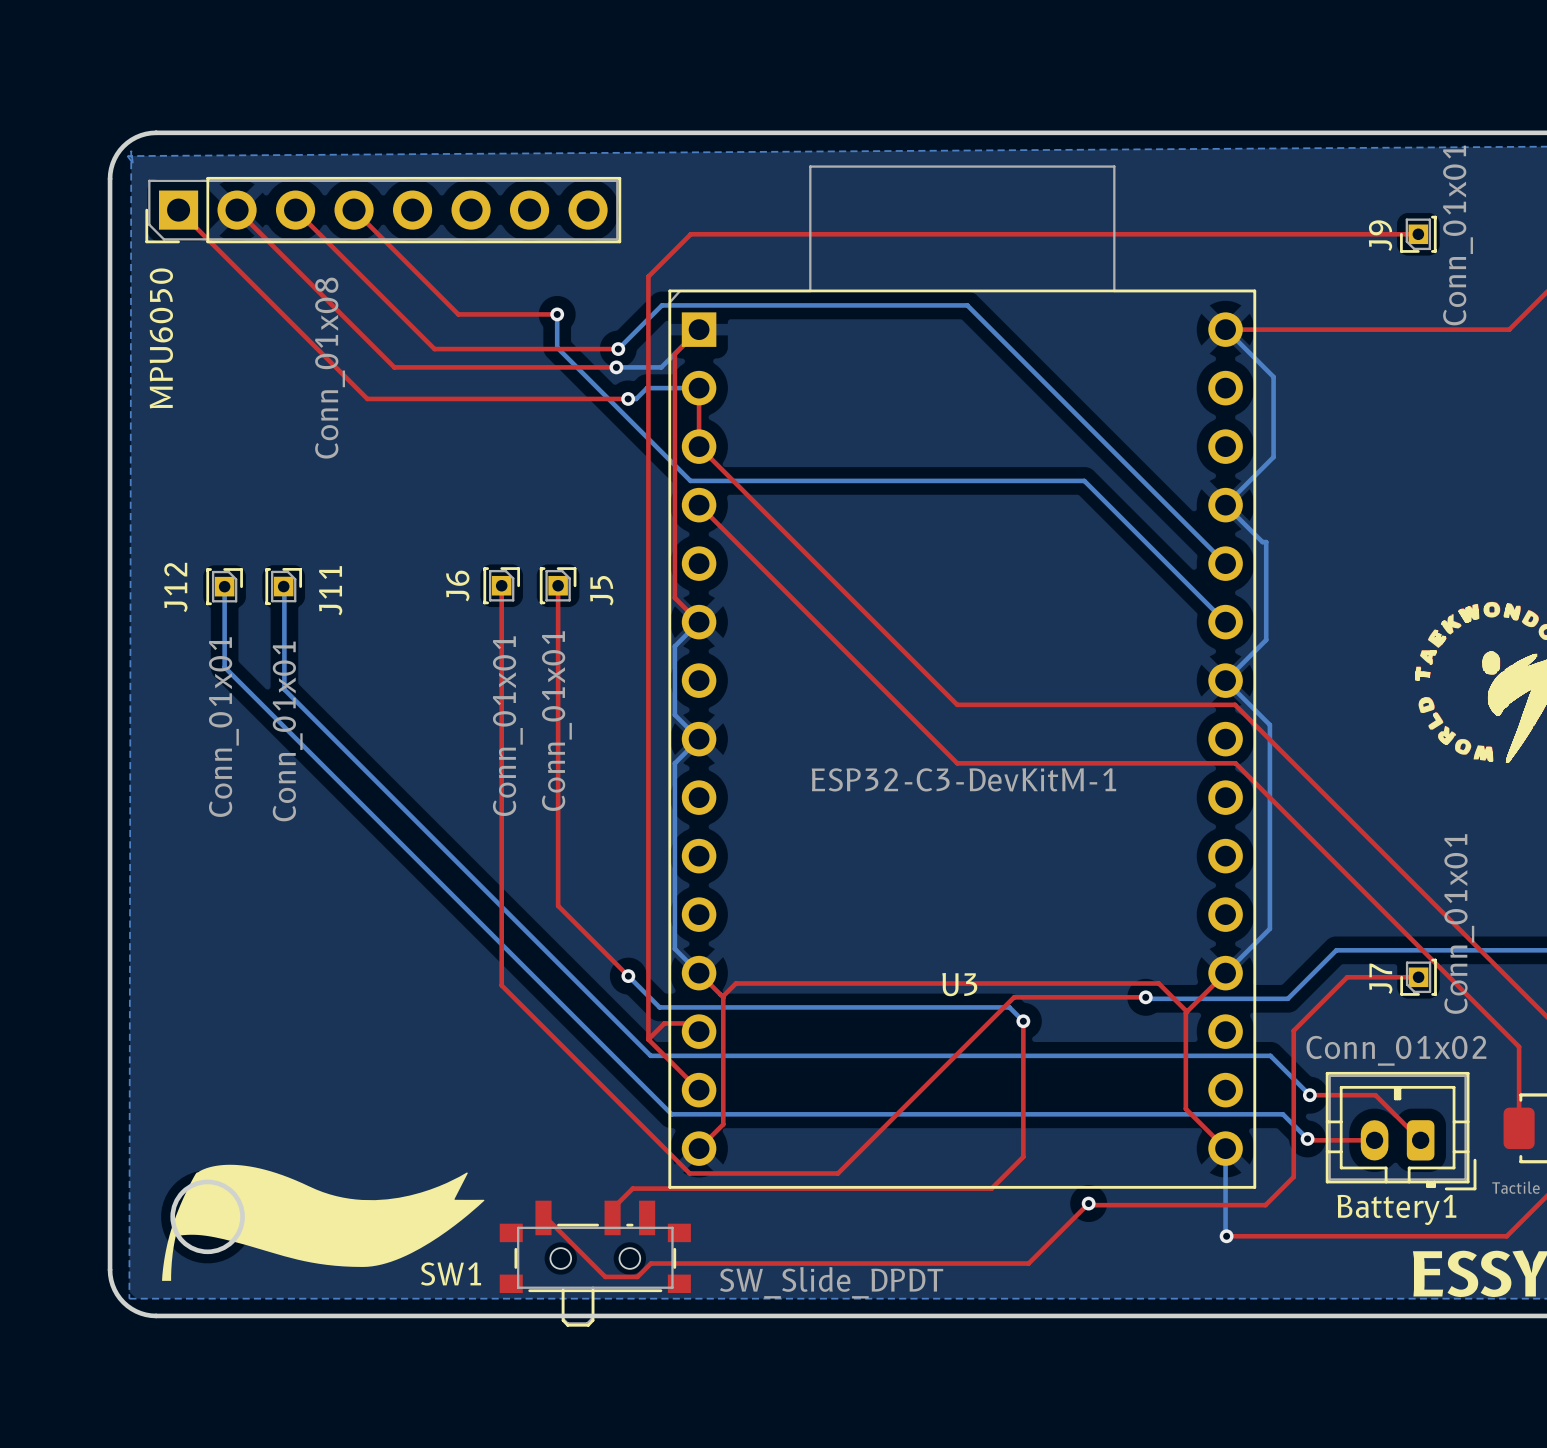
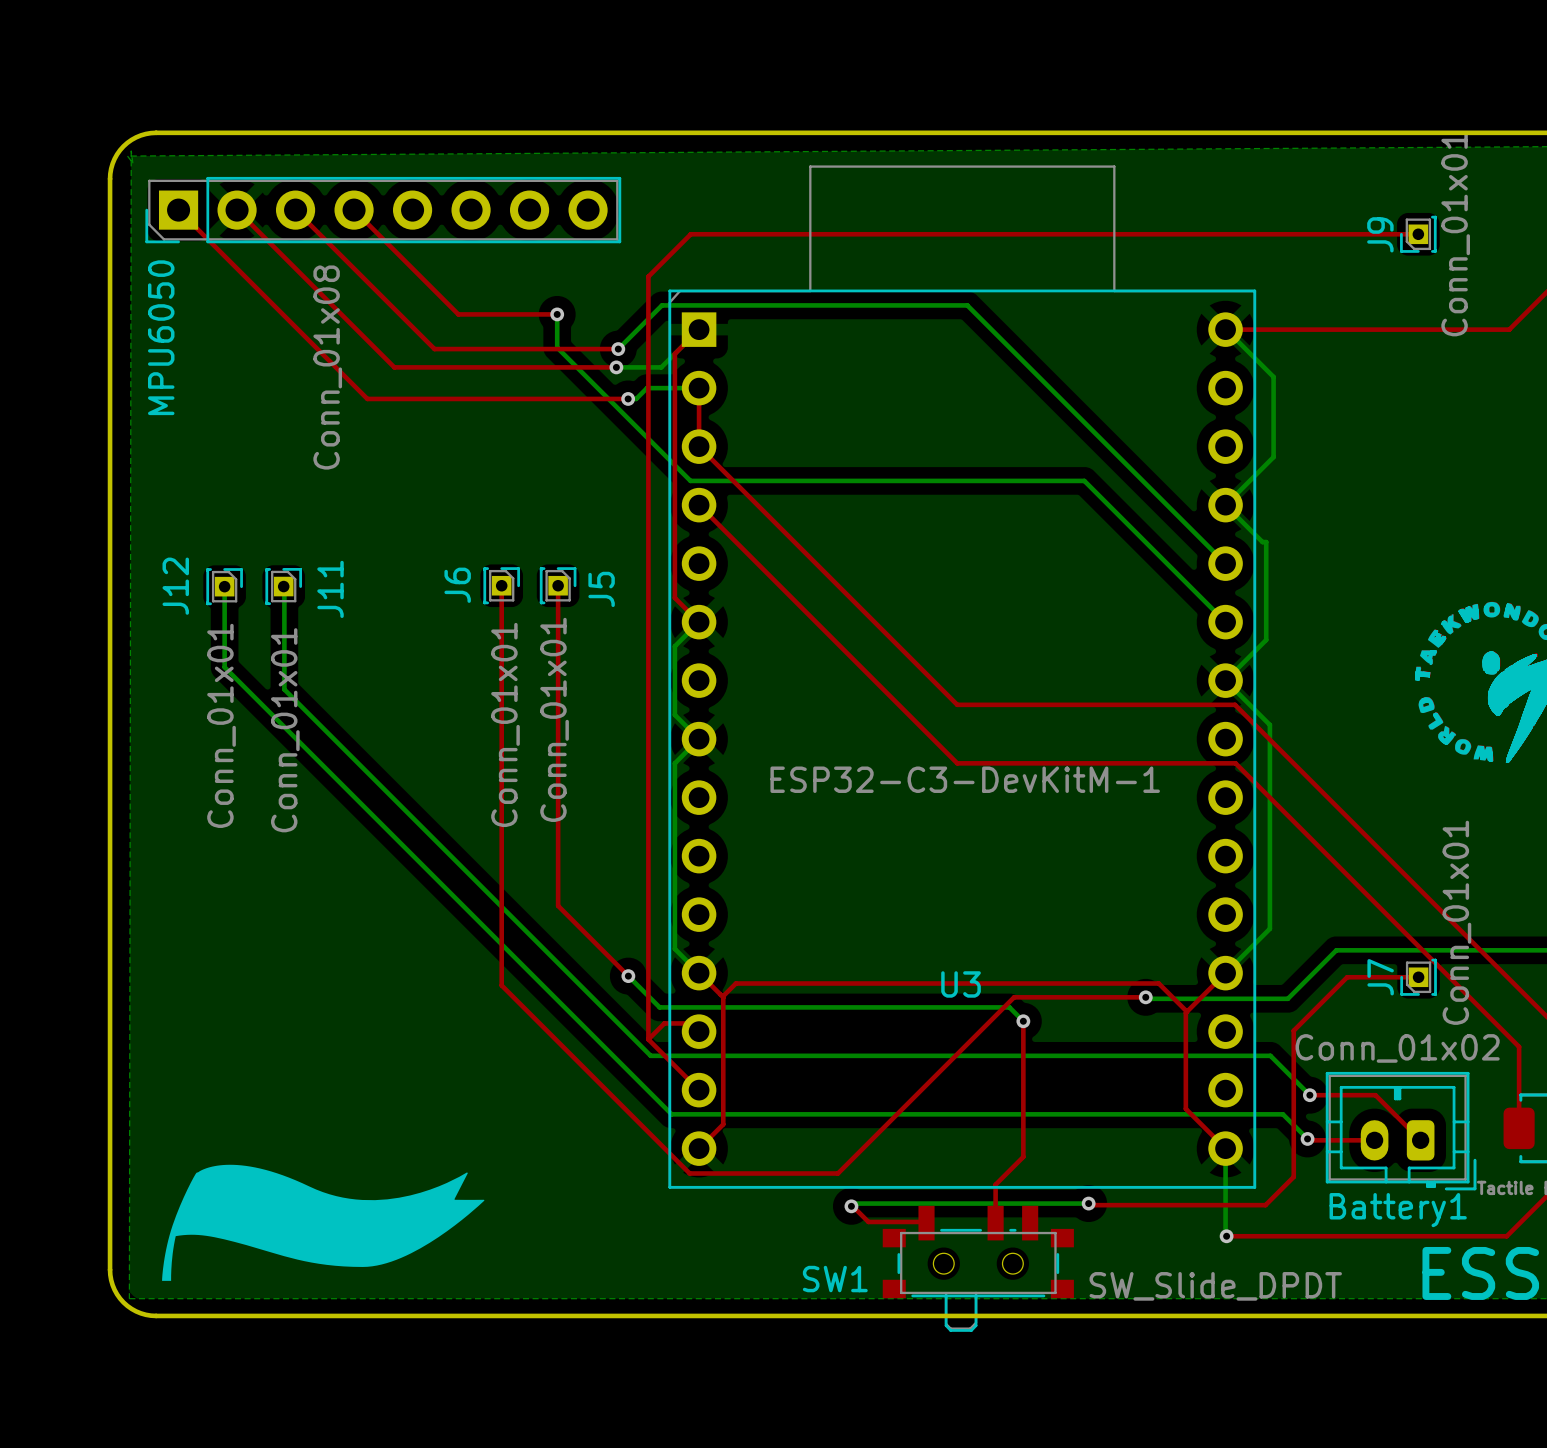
round board edge: [170, 1179, 245, 1255] -> none
top track: (995, 1184) (991, 1188) (632, 1188) (612, 1208) (612, 1217) -> (995, 1184) (995, 1223)
top track: (1088, 1203) (1028, 1263) (650, 1263) (637, 1276) (605, 1276) (546, 1217) (543, 1217) -> none
bottom track: none -> (1088, 1203) (854, 1203) (851, 1206)
top track: none -> (851, 1206) (868, 1221) (926, 1223)
via: none -> (851, 1206)
SW1 position: (595, 1263) -> (978, 1268)

